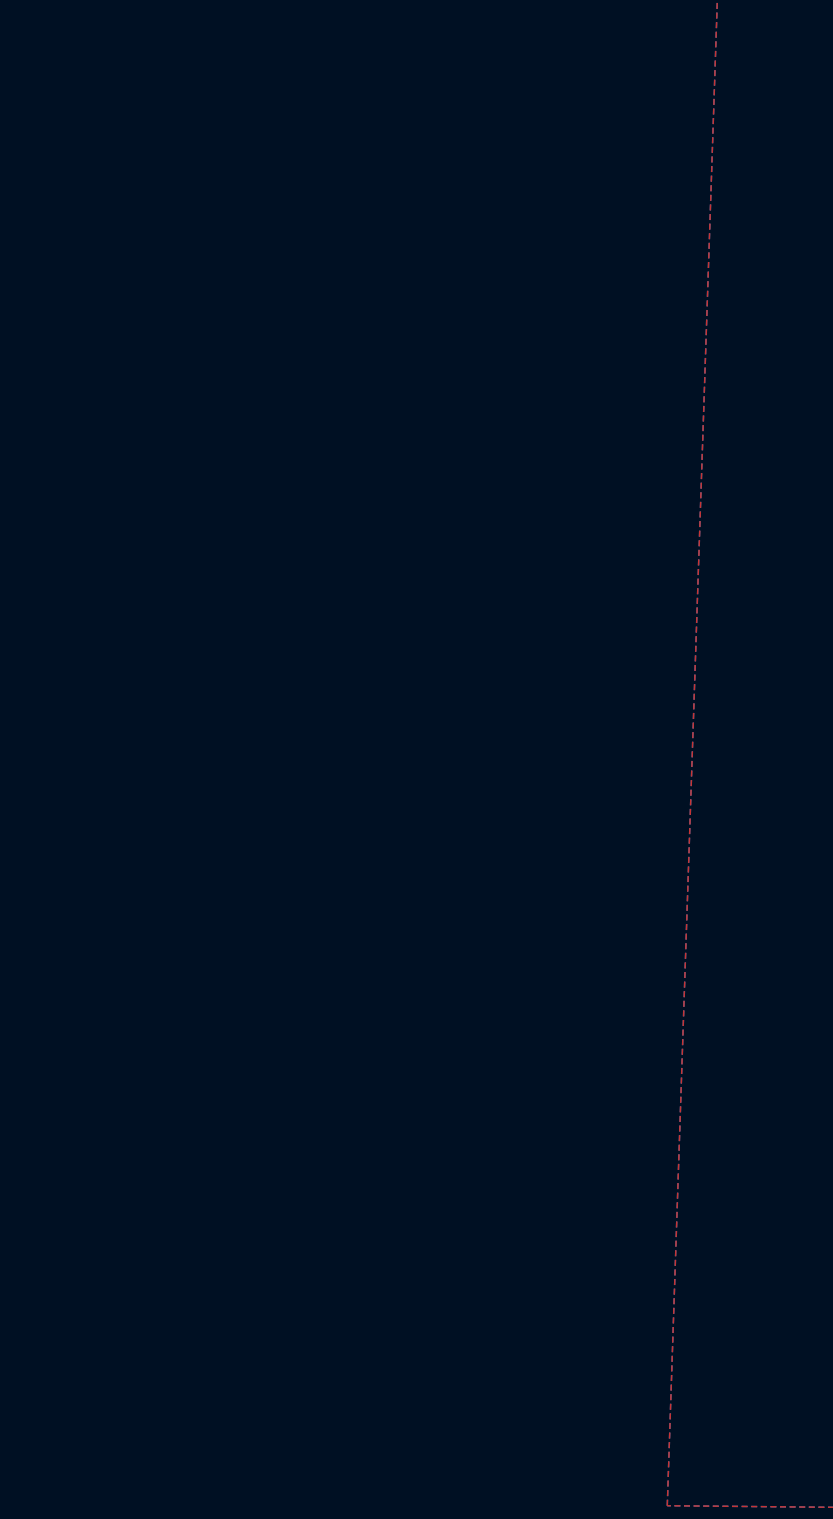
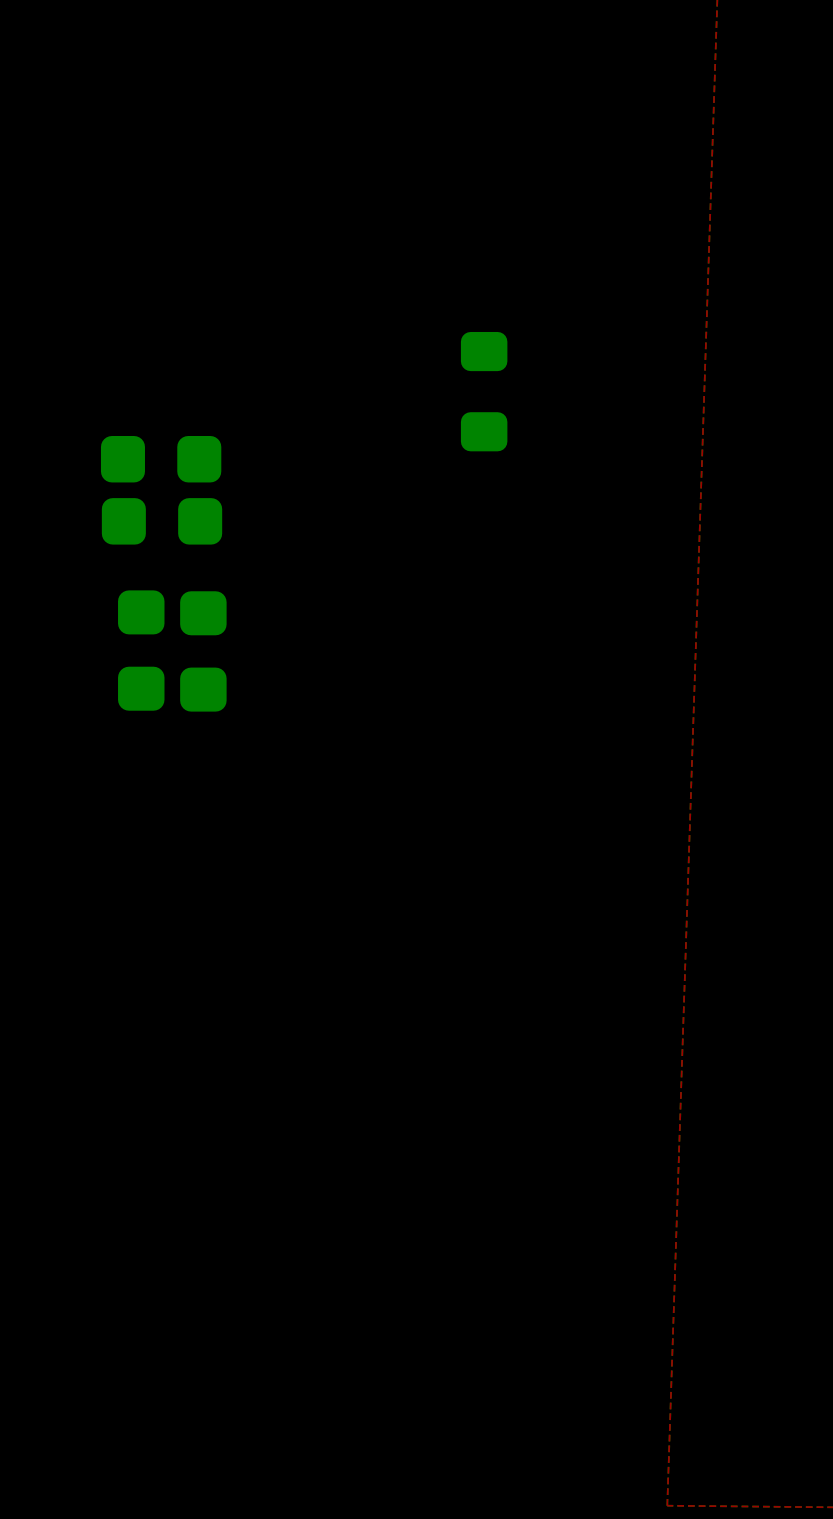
part: none -> (484, 391)
part: none -> (161, 459)
part: none -> (162, 521)
part: none -> (141, 650)
part: none -> (203, 651)

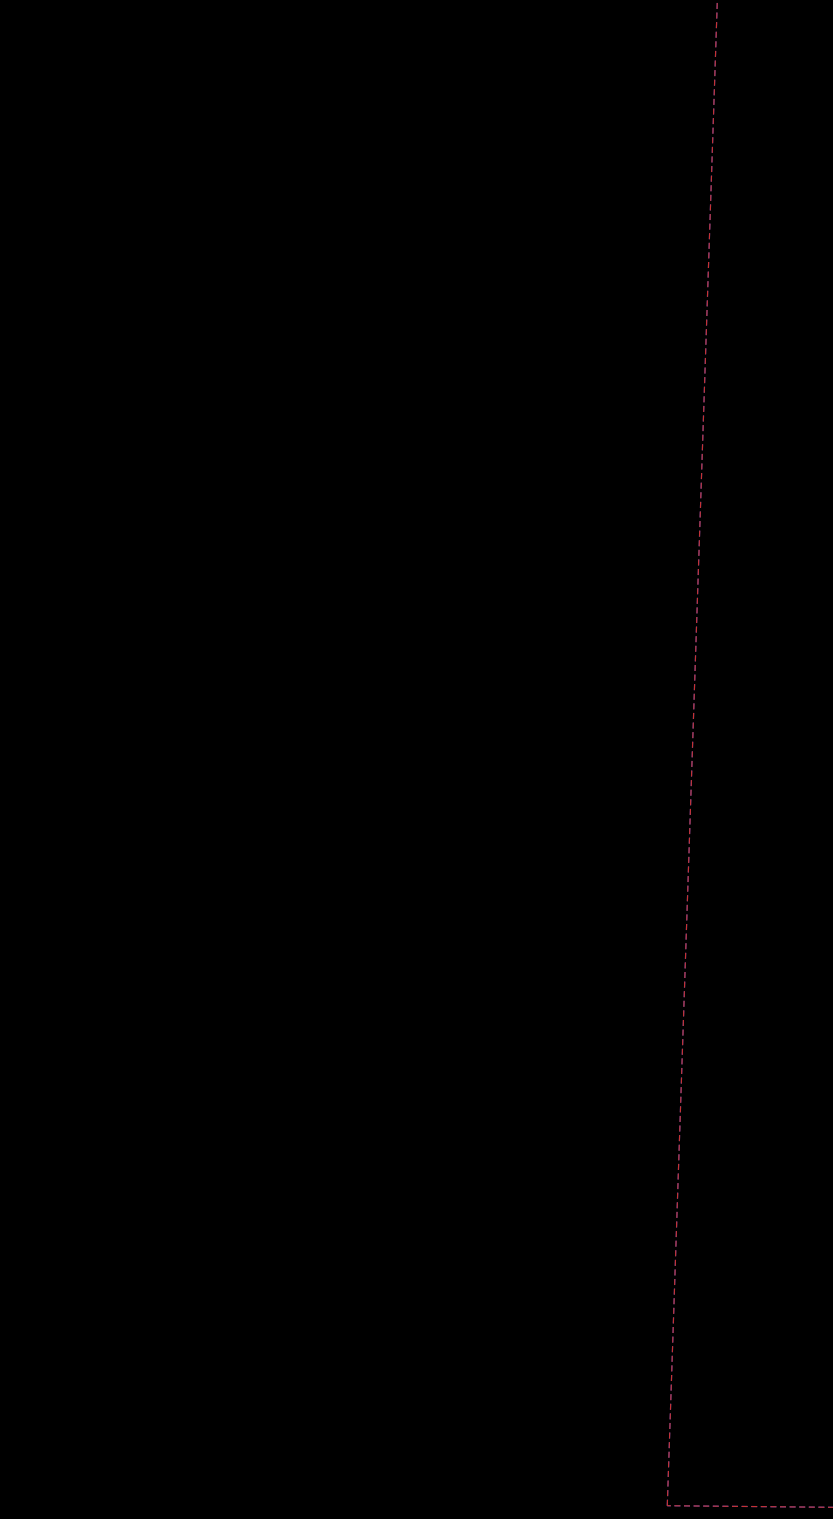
part: (484, 391) -> none
part: (161, 459) -> none
part: (162, 521) -> none
part: (141, 650) -> none
part: (203, 651) -> none

